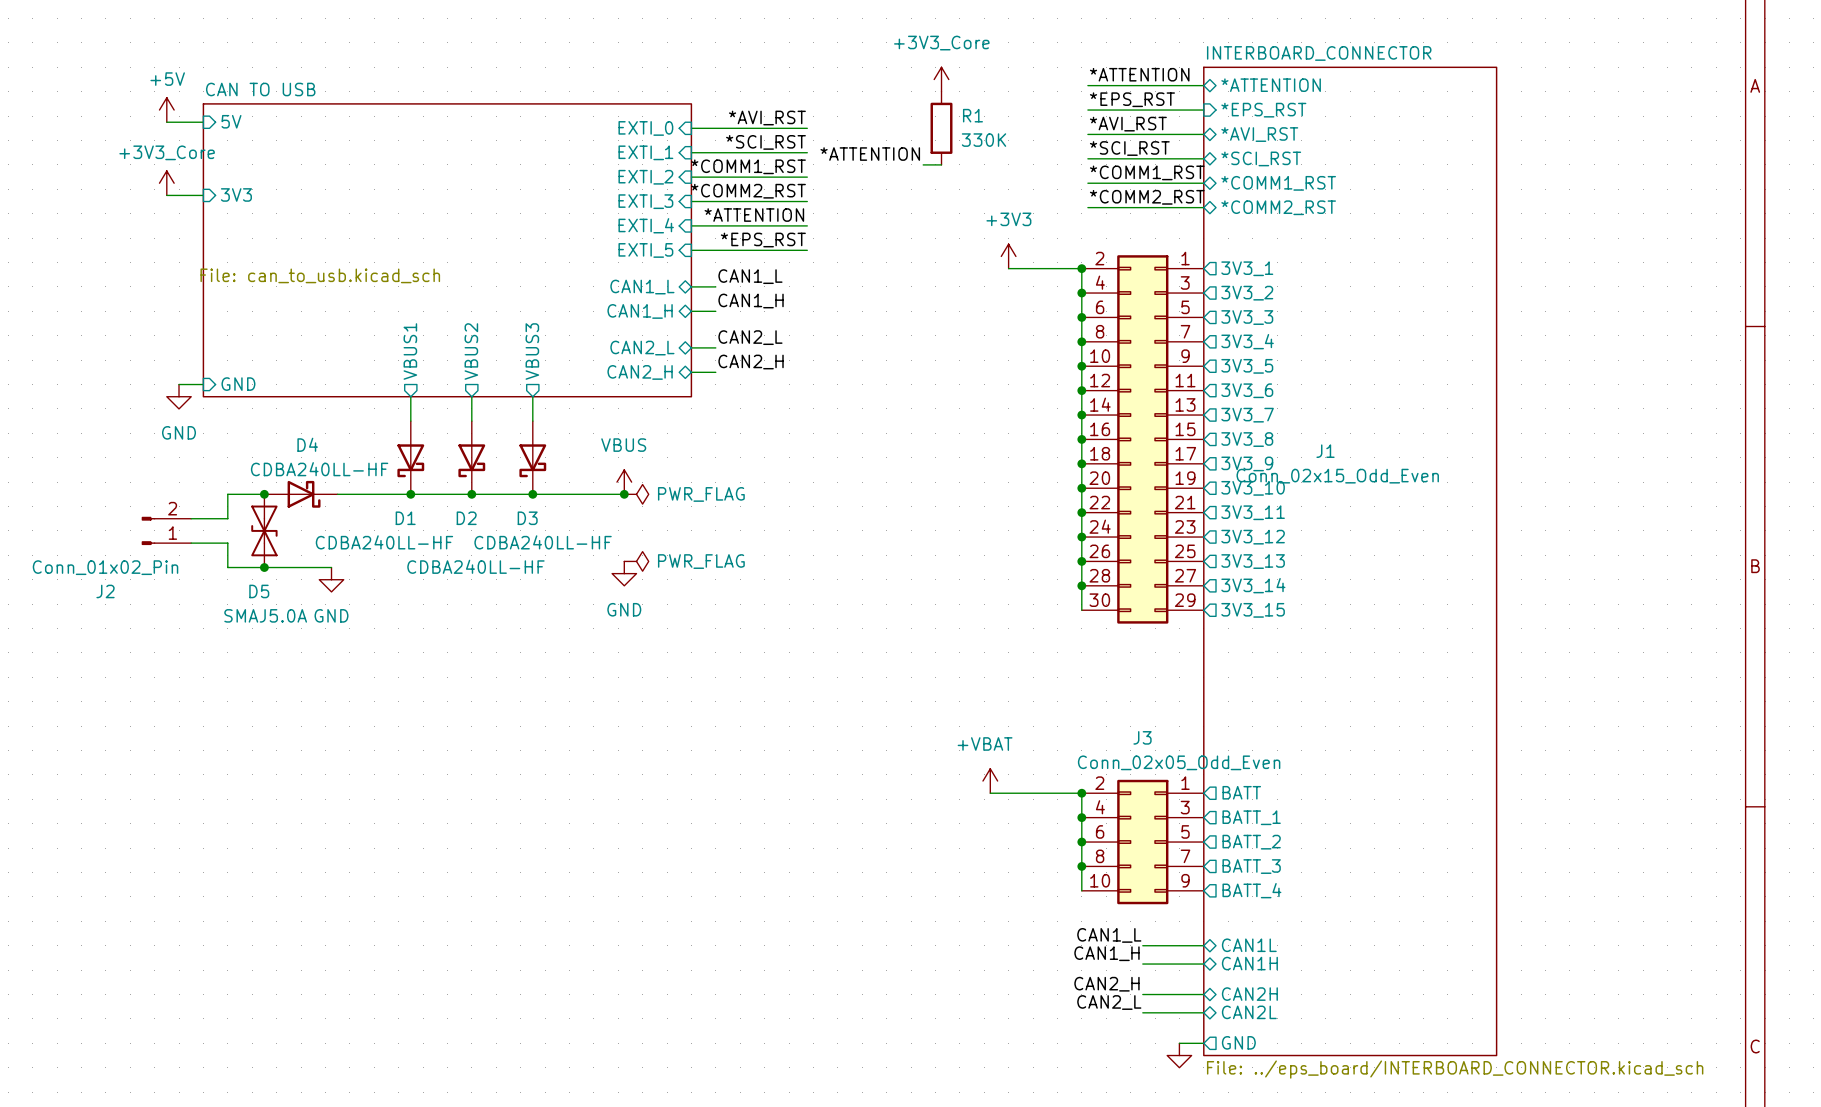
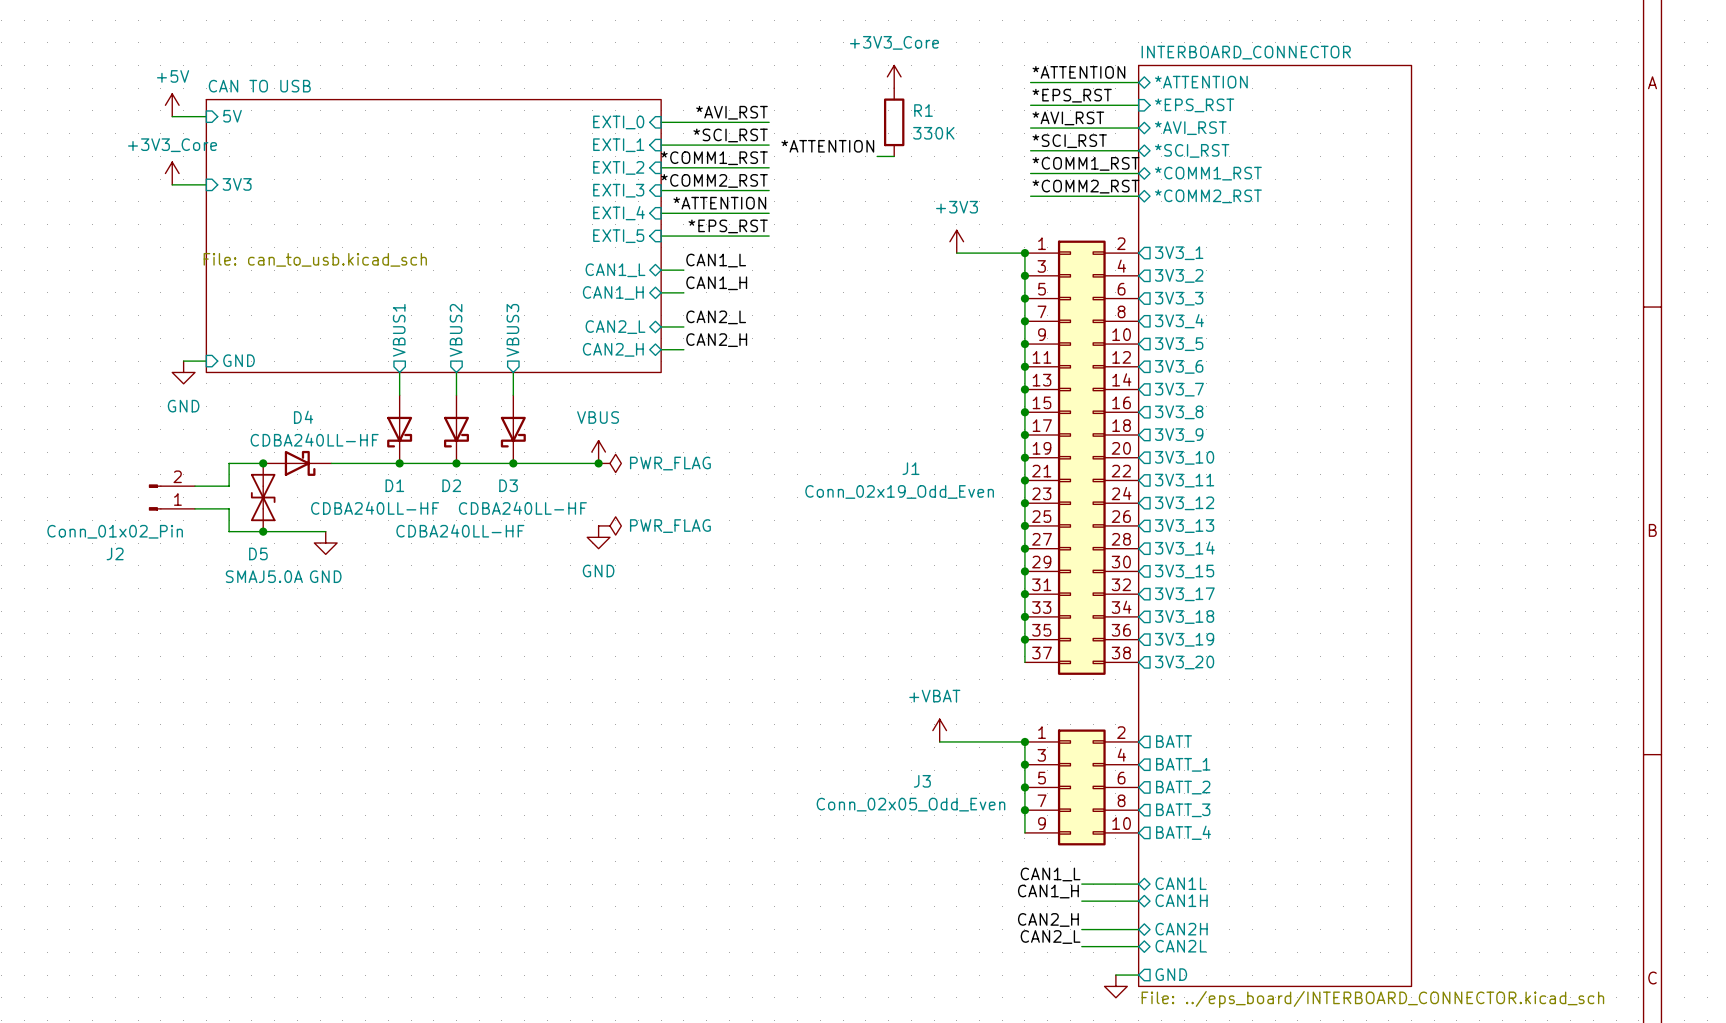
J1 symbol: [1081, 255, 1204, 624] -> [1024, 240, 1139, 675]
J1 name position: J1 (1325, 451) -> J1 (910, 468)
J1 value: Conn_02x15_Odd_Even (1337, 476) -> Conn_02x19_Odd_Even (899, 491)
wire: none -> (1024, 571) (1024, 662)
junction: none -> (1024, 571)
junction: none -> (1024, 594)
sheet pin: none -> 3V3_17 (1184, 594)
junction: none -> (1024, 616)
sheet pin: none -> 3V3_18 (1184, 617)
junction: none -> (1024, 639)
sheet pin: none -> 3V3_19 (1184, 639)
sheet pin: none -> 3V3_20 (1184, 662)
J3 name position: J3 (1142, 737) -> J3 (922, 781)
J3 value position: Conn_02x05_Odd_Even (1179, 762) -> Conn_02x05_Odd_Even (910, 804)
J3 flip: as is (1142, 842) -> left-right (1081, 787)

